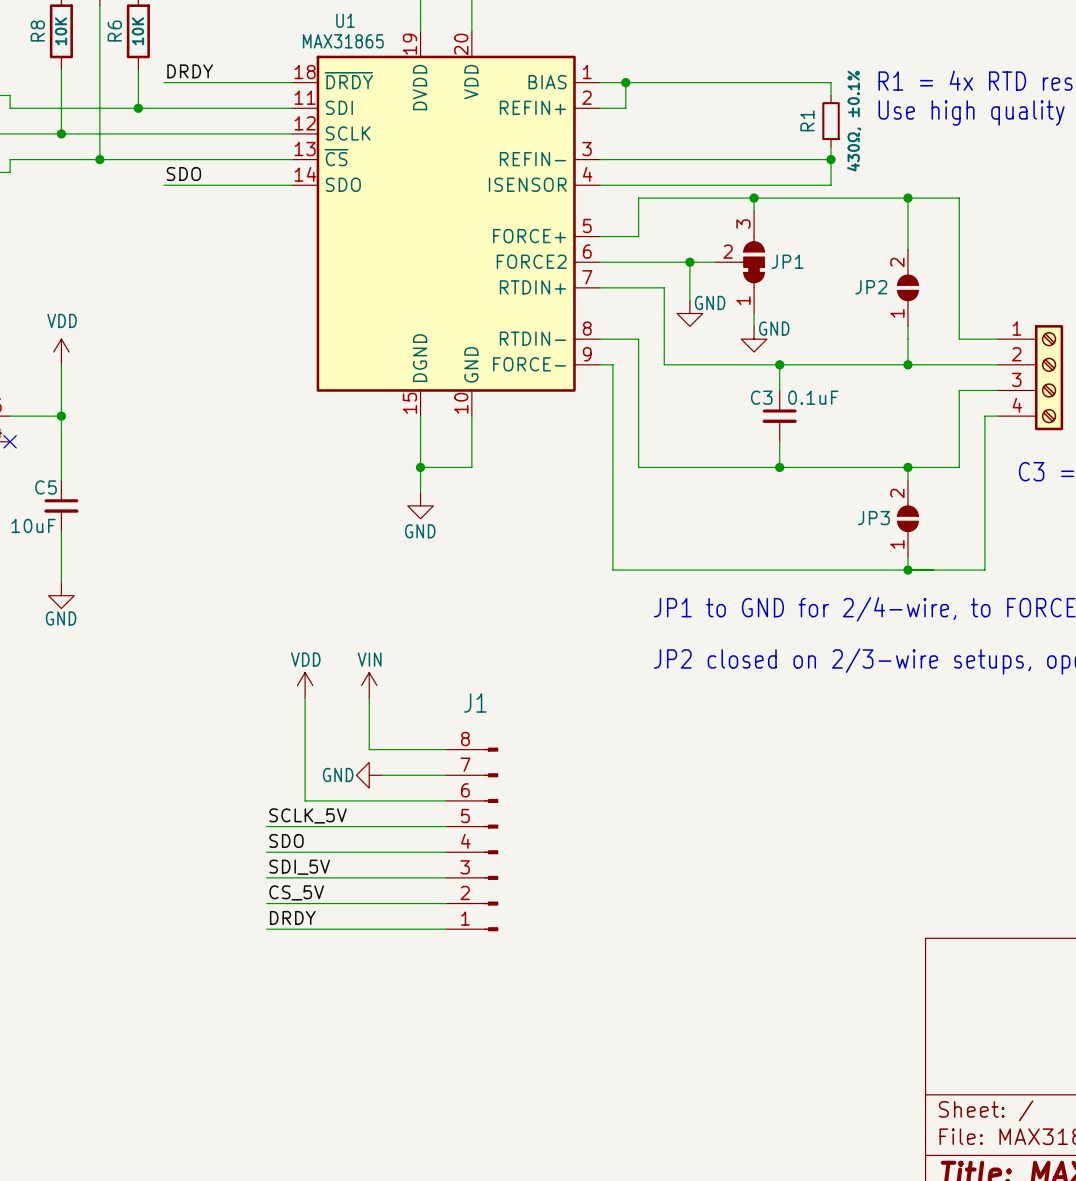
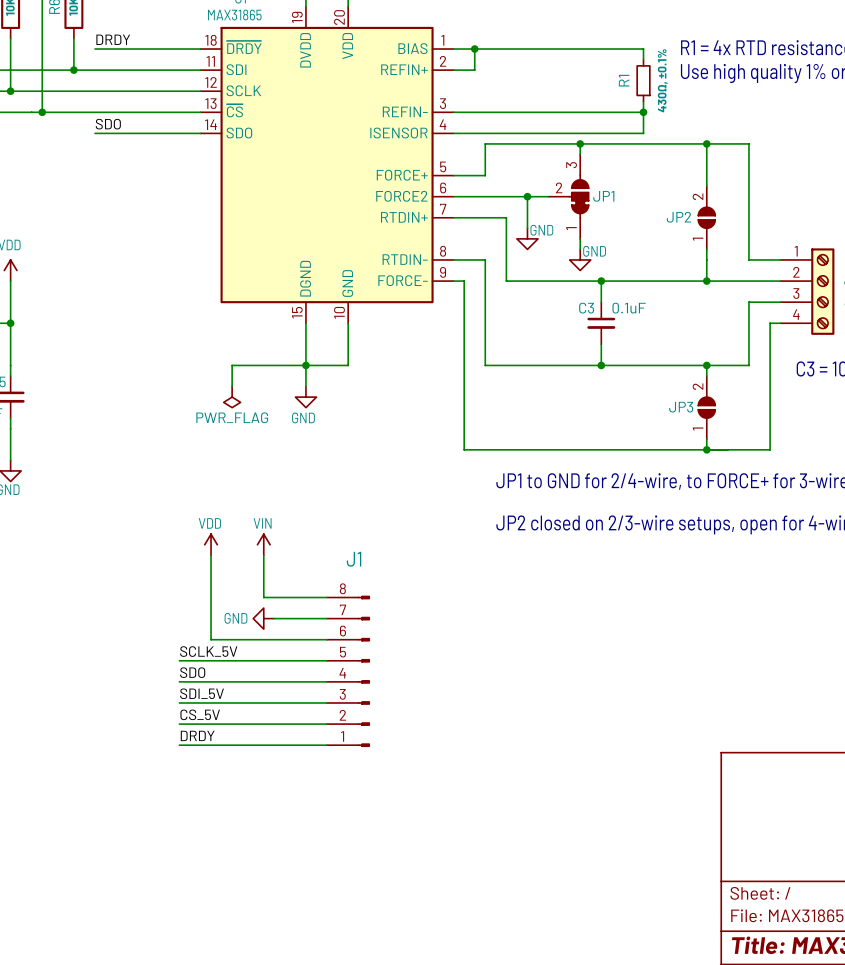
wire: none -> (305, 365) (232, 365) (232, 386)
power symbol: none -> PWR_FLAG (232, 397)

